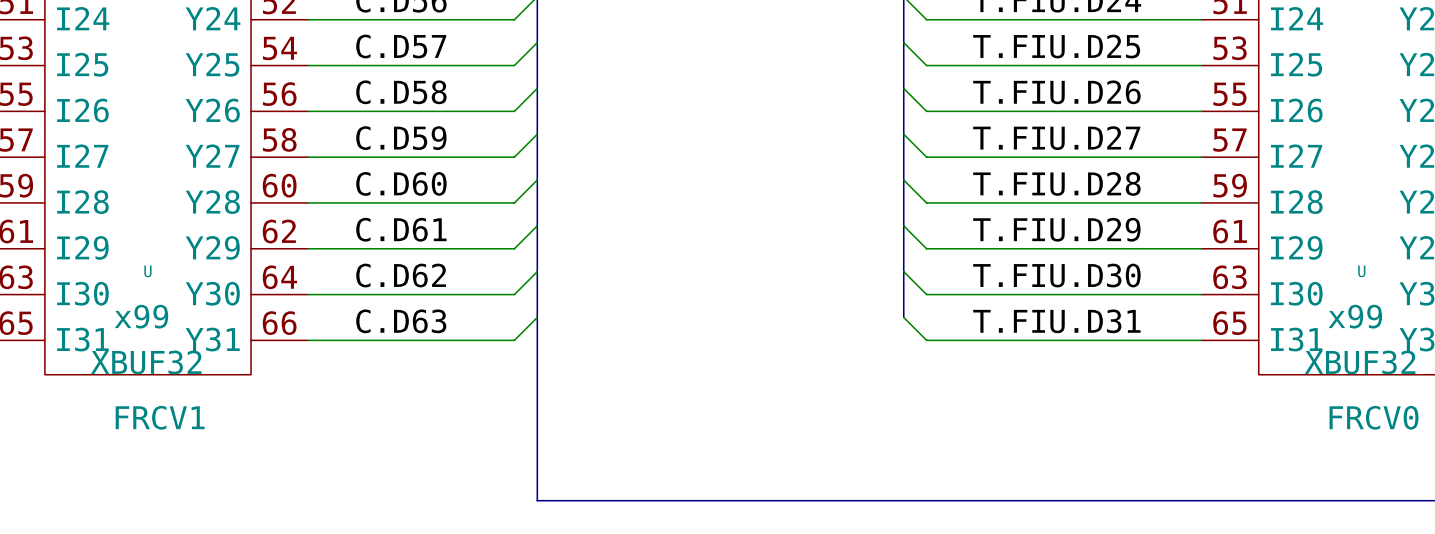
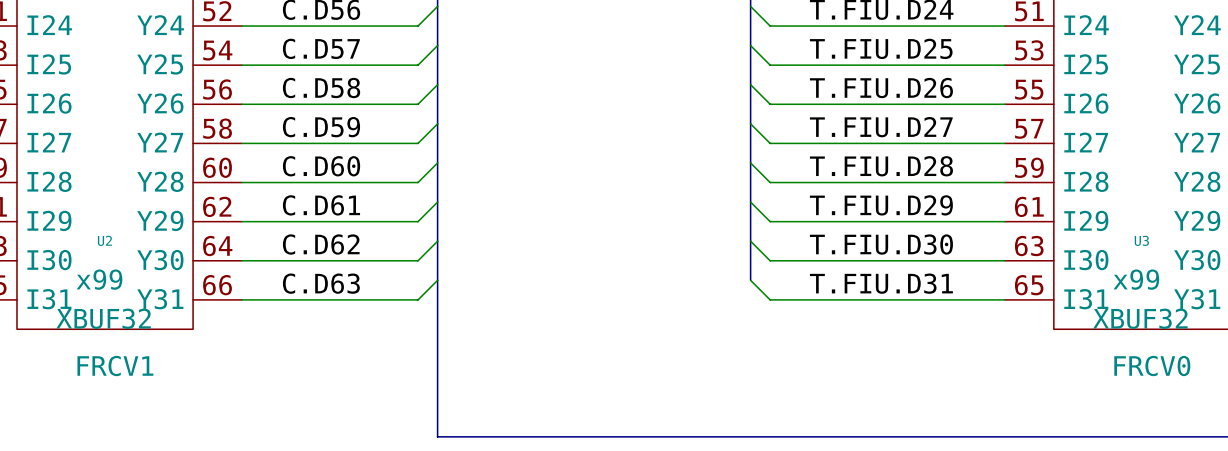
U name: U (147, 271) -> U2 (104, 240)
U name: U (1361, 271) -> U3 (1141, 240)

